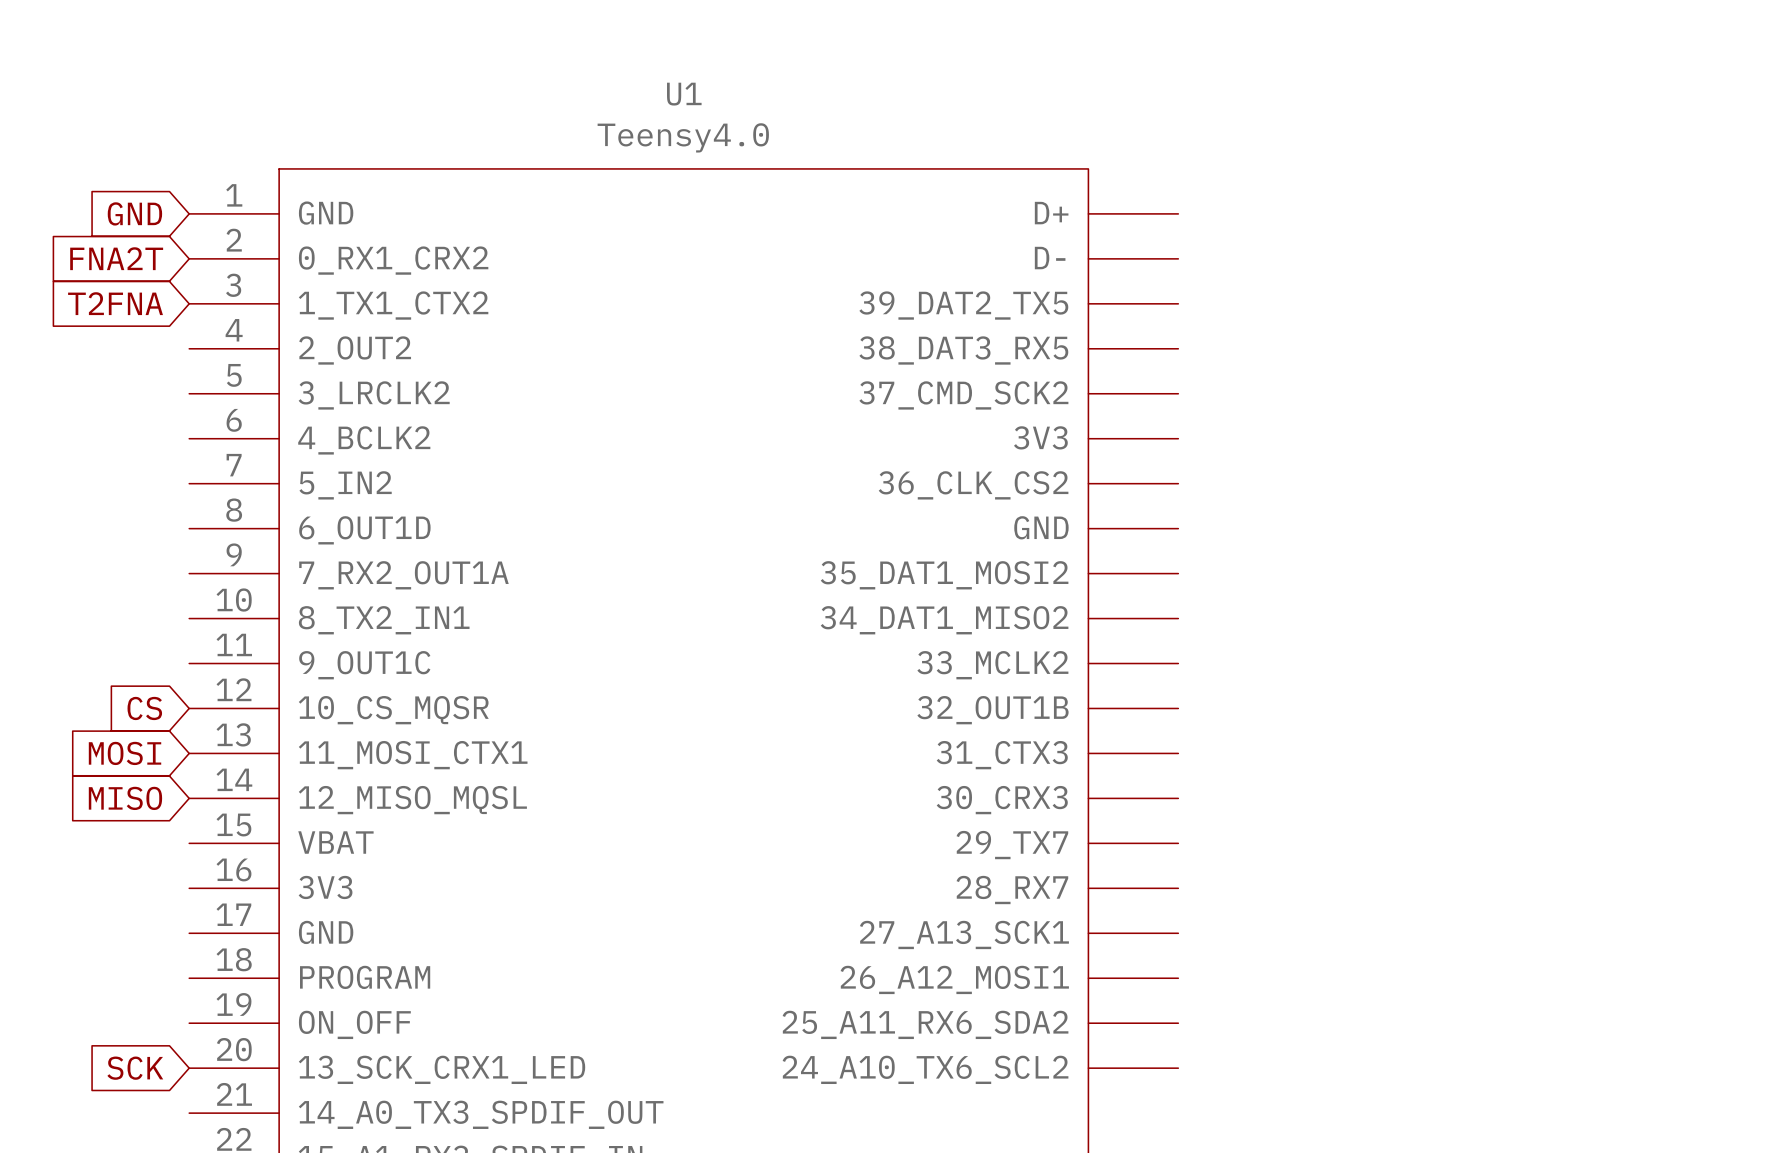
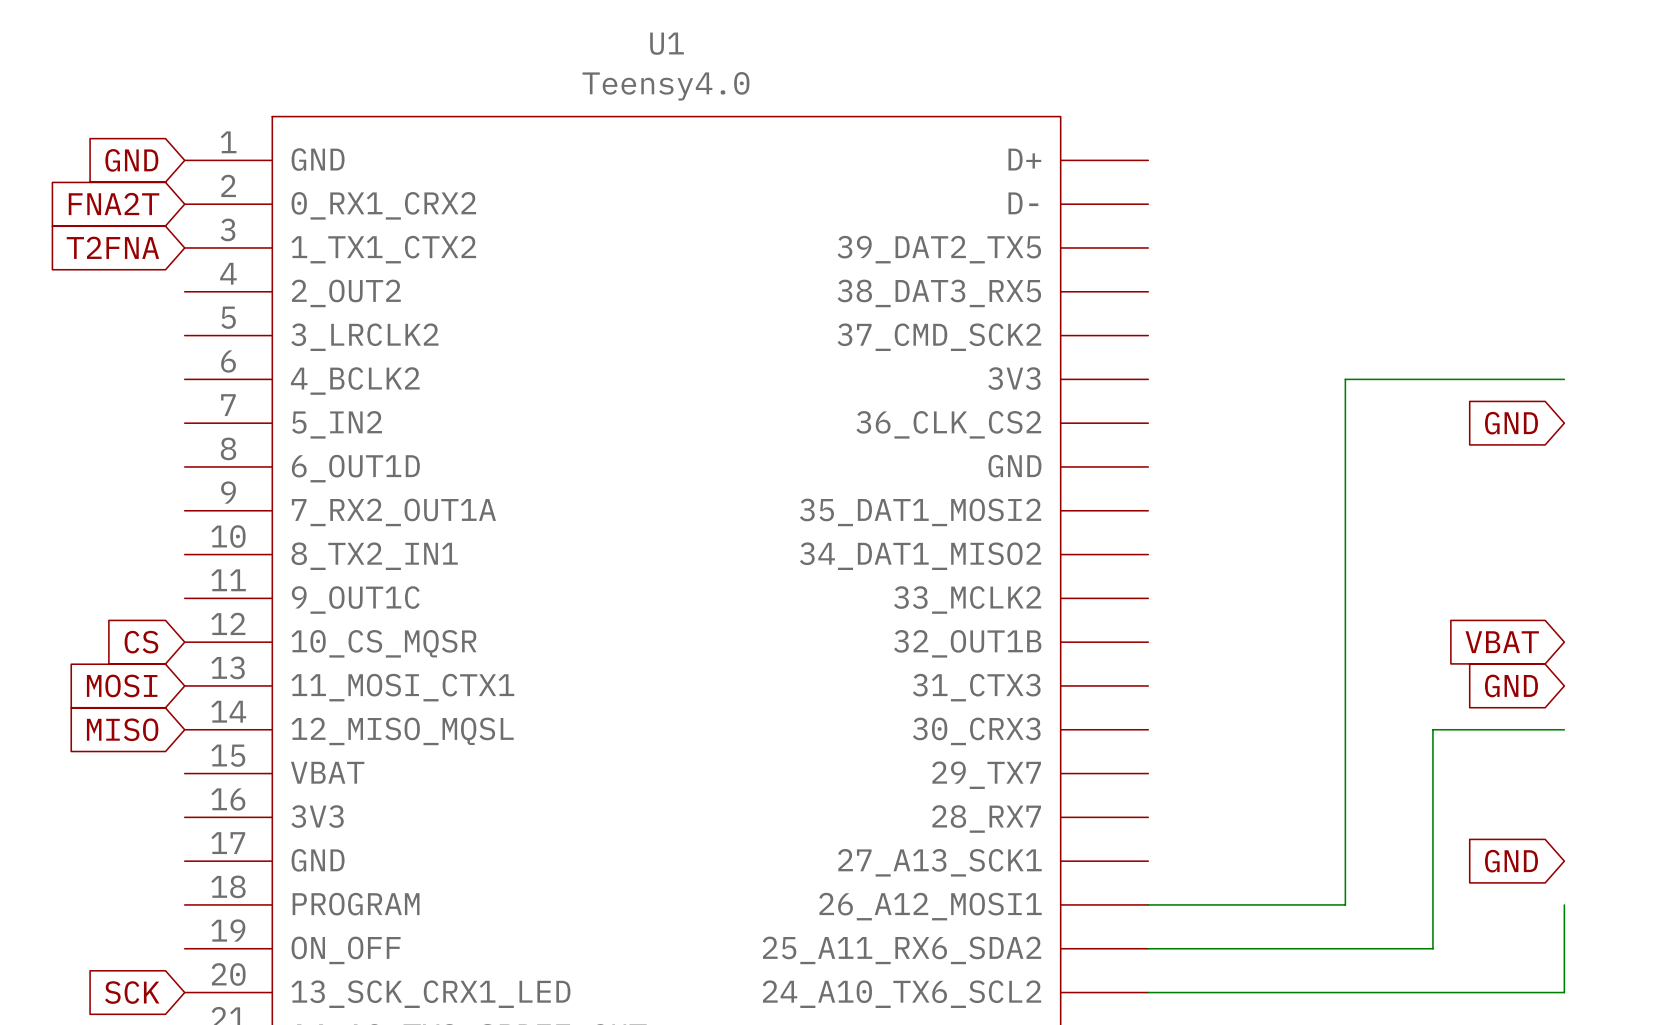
wire: none -> (1564, 379) (1345, 379) (1345, 904) (1148, 904)
global label: none -> GND (1511, 423)
global label: none -> VBAT (1502, 642)
global label: none -> GND (1511, 685)
wire: none -> (1564, 729) (1432, 729) (1432, 948) (1148, 948)
global label: none -> GND (1511, 861)
wire: none -> (1564, 904) (1564, 992) (1148, 992)

